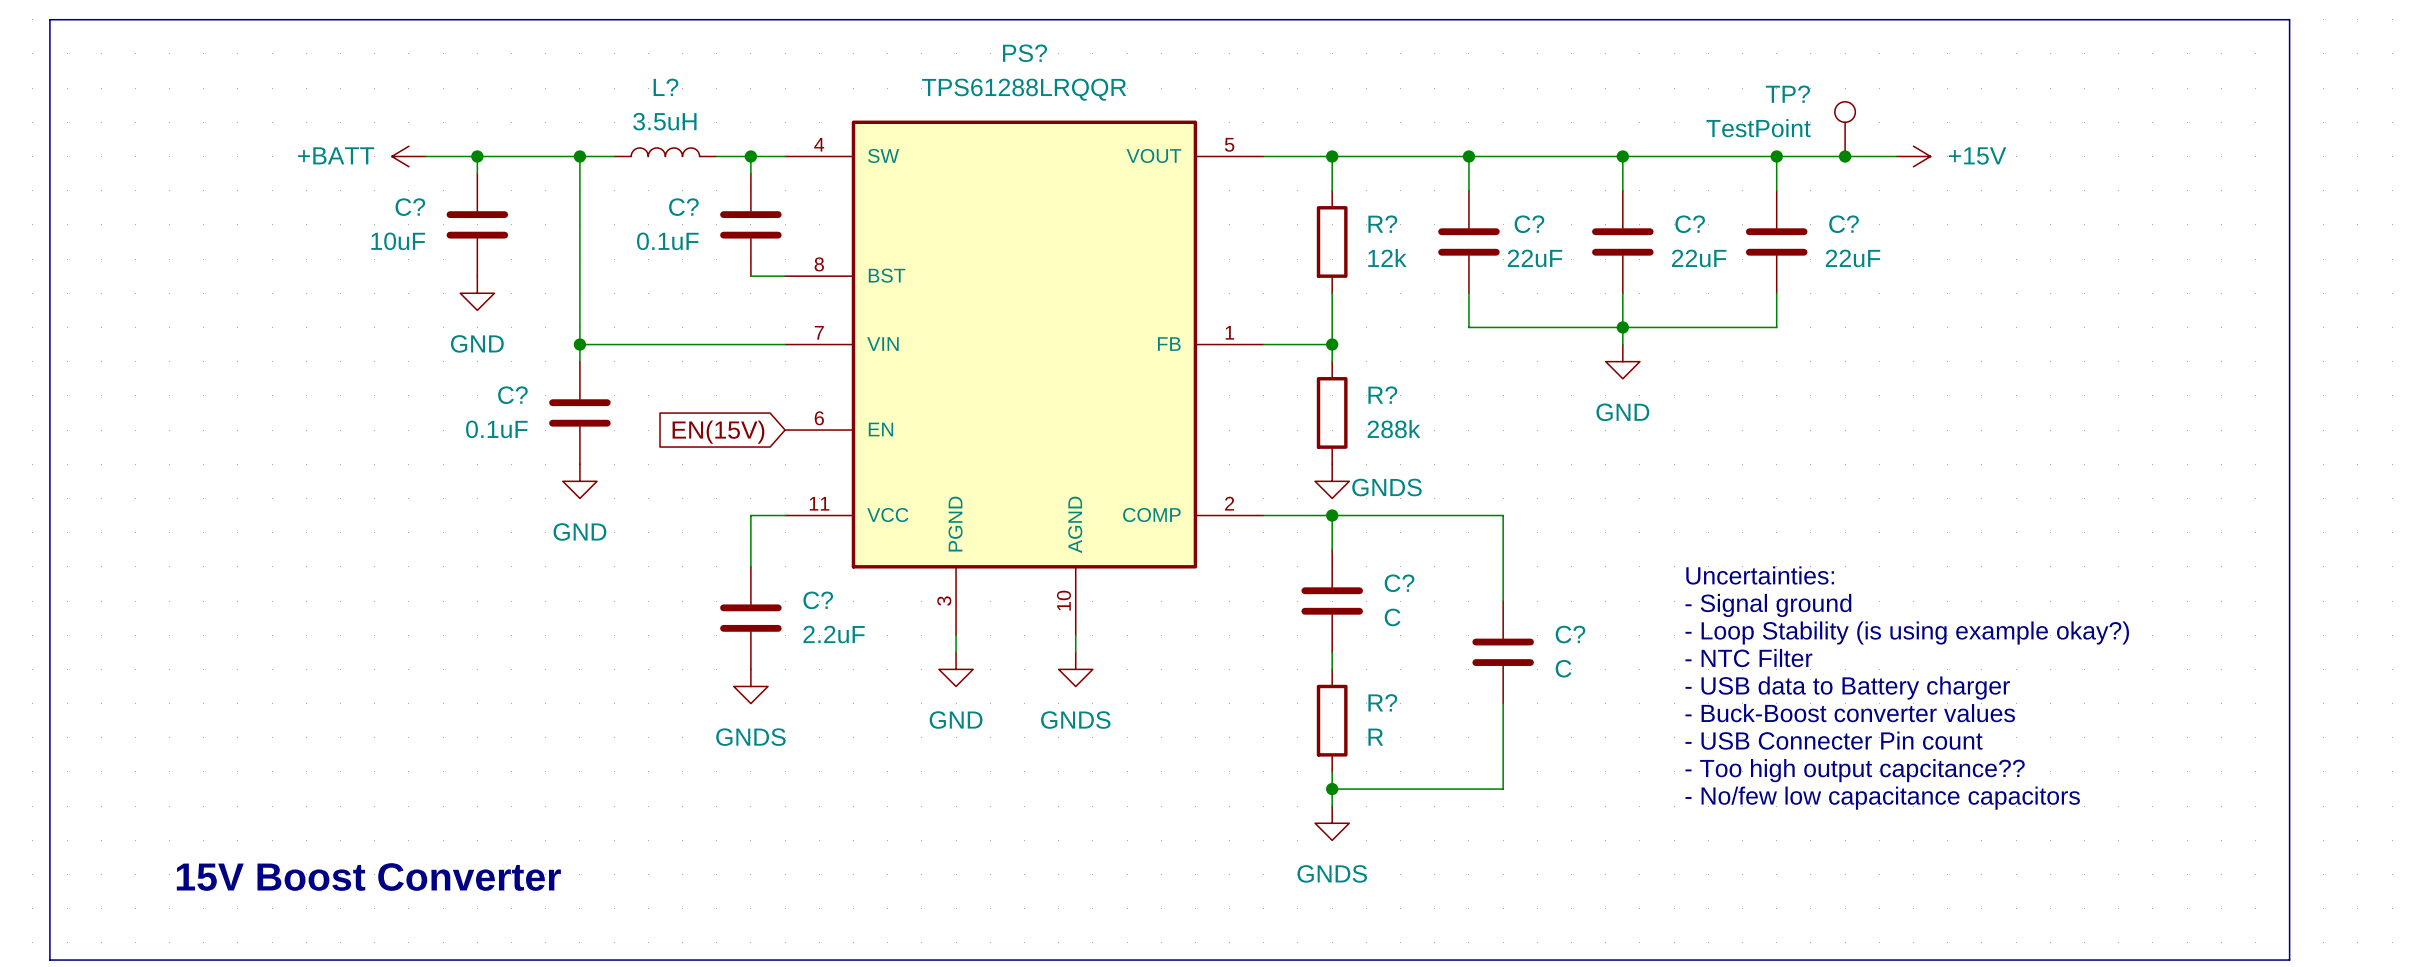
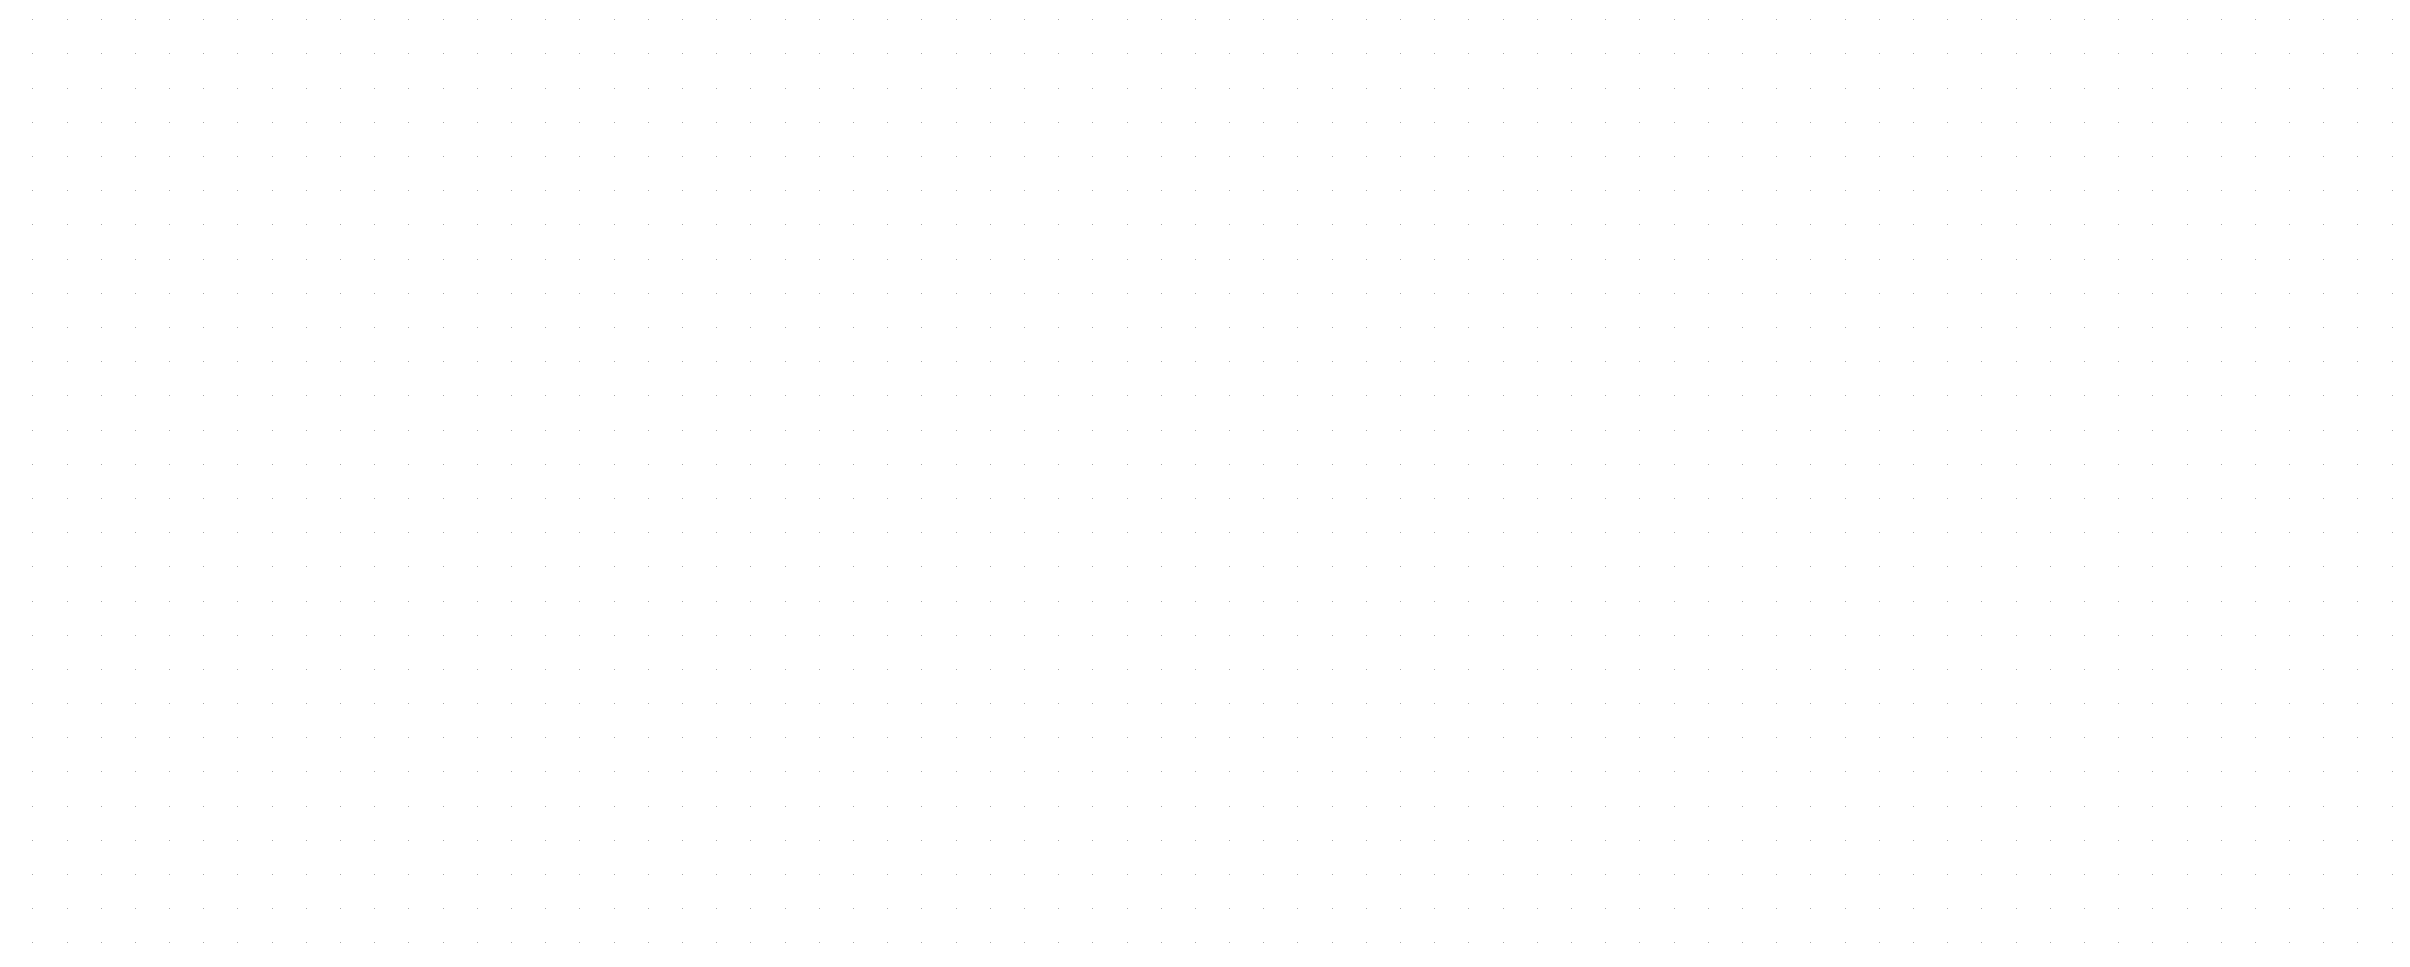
line: (49, 19) (2289, 19) (2289, 960) (49, 960) (49, 19) -> none
TP?: TestPoint (1845, 129) -> none
L?: 3.5uH (665, 152) -> none
power symbol: +BATT (408, 156) -> none
wire: (426, 156) (614, 156) -> none
wire: (477, 156) (477, 173) -> none
junction: (477, 156) -> none
wire: (579, 156) (579, 361) -> none
junction: (579, 156) -> none
wire: (716, 156) (785, 156) -> none
wire: (750, 156) (750, 173) -> none
junction: (750, 156) -> none
wire: (1263, 156) (1896, 156) -> none
wire: (1332, 156) (1332, 190) -> none
junction: (1332, 156) -> none
wire: (1468, 156) (1468, 190) -> none
junction: (1468, 156) -> none
wire: (1622, 156) (1622, 190) -> none
junction: (1622, 156) -> none
wire: (1776, 156) (1776, 190) -> none
junction: (1776, 156) -> none
junction: (1845, 156) -> none
power symbol: +15V (1913, 156) -> none
C?: 10uF (477, 224) -> none
C?: 0.1uF (750, 224) -> none
R?: 12k (1332, 241) -> none
C?: 22uF (1468, 241) -> none
C?: 22uF (1622, 241) -> none
C?: 22uF (1776, 241) -> none
wire: (750, 276) (785, 276) -> none
power symbol: GND (477, 293) -> none
wire: (1332, 293) (1332, 361) -> none
wire: (1468, 293) (1468, 327) (1776, 327) (1776, 293) -> none
wire: (1622, 293) (1622, 344) -> none
junction: (1622, 327) -> none
wire: (579, 344) (785, 344) -> none
junction: (579, 344) -> none
wire: (1263, 344) (1332, 344) -> none
junction: (1332, 344) -> none
power symbol: GND (1622, 361) -> none
PS?: TPS61288LRQQR (1024, 377) -> none
C?: 0.1uF (579, 412) -> none
R?: 288k (1332, 412) -> none
global label: EN(15V) (718, 432) -> none
power symbol: GND (579, 481) -> none
power symbol: GNDS (1332, 481) -> none
wire: (785, 515) (750, 515) (750, 566) -> none
wire: (1263, 515) (1503, 515) (1503, 601) -> none
wire: (1332, 515) (1332, 549) -> none
junction: (1332, 515) -> none
text: Uncertainties: (1760, 575) -> none
C?: C (1332, 601) -> none
text: - Signal ground (1768, 605) -> none
C?: 2.2uF (750, 618) -> none
text: - Loop Stability (is using example okay?) (1907, 632) -> none
wire: (956, 635) (956, 652) -> none
wire: (1075, 635) (1075, 652) -> none
wire: (1332, 652) (1332, 669) -> none
C?: C (1503, 652) -> none
text: - NTC Filter (1748, 658) -> none
power symbol: GND (956, 669) -> none
power symbol: GNDS (1075, 669) -> none
power symbol: GNDS (750, 686) -> none
text: - USB data to Battery charger (1847, 688) -> none
wire: (1503, 703) (1503, 789) (1332, 789) -> none
text: - Buck-Boost converter values (1850, 713) -> none
R?: R (1332, 720) -> none
text: - USB Connecter Pin count (1834, 740) -> none
text: - Too high output capcitance?? (1855, 770) -> none
wire: (1332, 771) (1332, 806) -> none
junction: (1332, 789) -> none
text: - No/few low capacitance capacitors (1882, 798) -> none
power symbol: GNDS (1332, 823) -> none
text: 15V Boost Converter (368, 877) -> none

